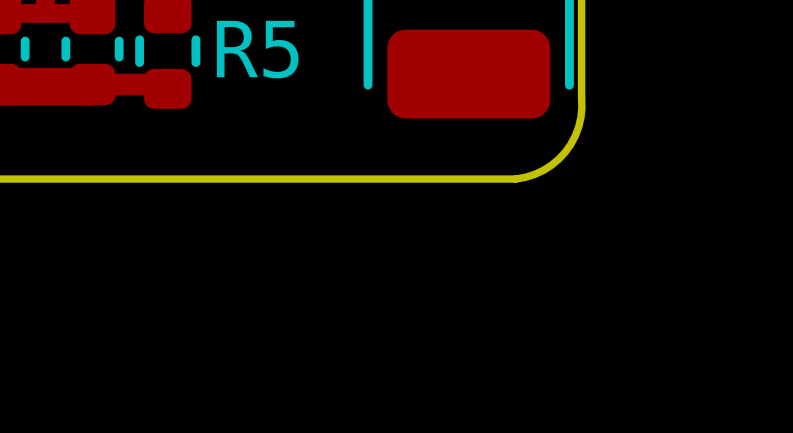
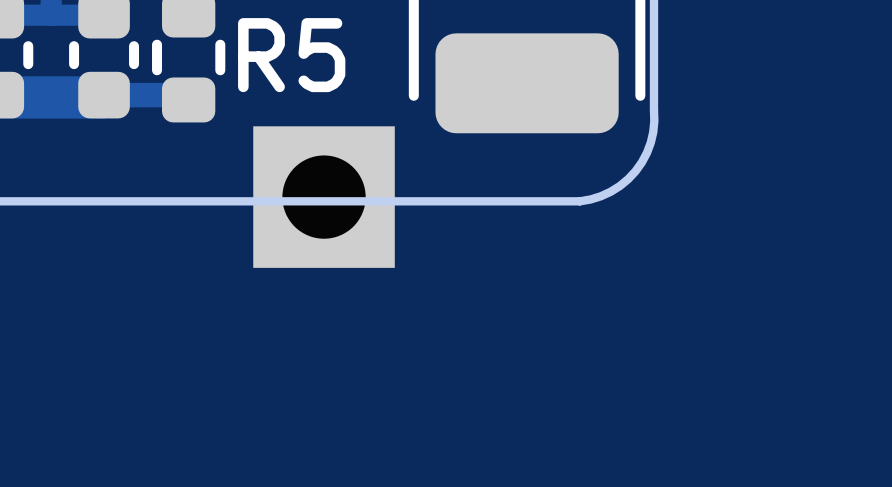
part: none -> (324, 197)

